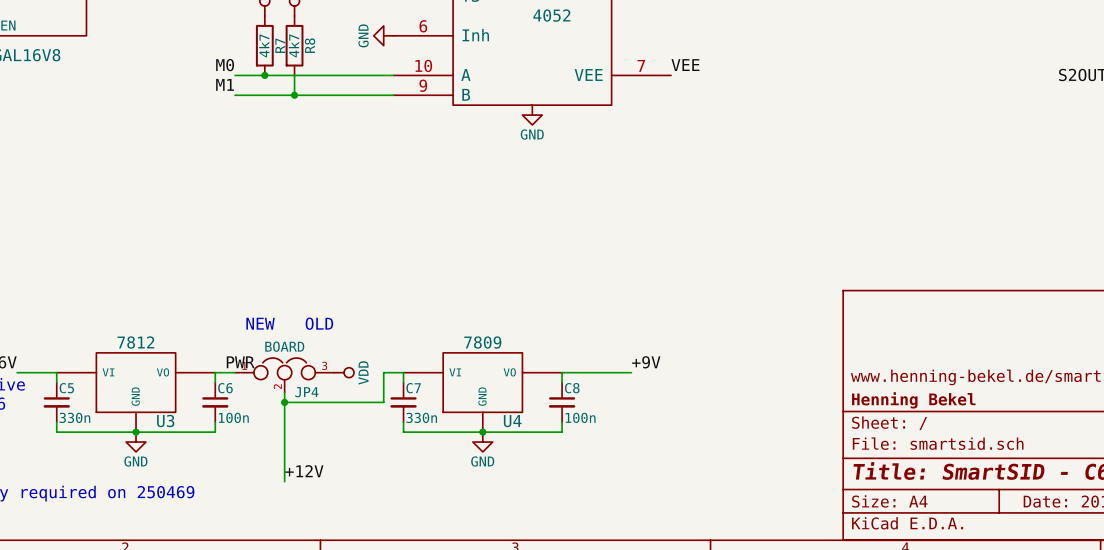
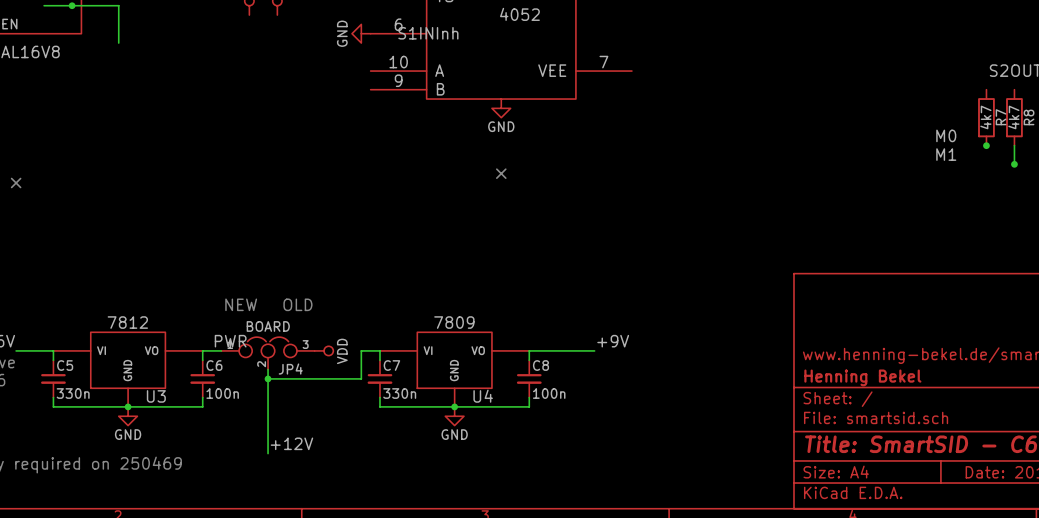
wire: none -> (44, 5) (118, 5) (118, 43)
junction: none -> (72, 5)
label: none -> S1IN (415, 33)
R7 position: (264, 45) -> (986, 117)
R8 position: (294, 45) -> (1014, 117)
label: M0 (225, 65) -> none
label: VEE (685, 65) -> none
wire: (235, 75) (393, 75) -> none
junction: (264, 75) -> none
wire: (294, 75) (294, 95) -> none
label: M1 (225, 84) -> none
wire: (235, 95) (393, 95) -> none
junction: (294, 95) -> none
label: none -> M0 (946, 135)
junction: none -> (986, 145)
wire: none -> (1014, 145) (1014, 164)
label: none -> M1 (946, 154)
junction: none -> (1014, 164)
no-connect mark: none -> (501, 173)
no-connect mark: none -> (16, 183)

